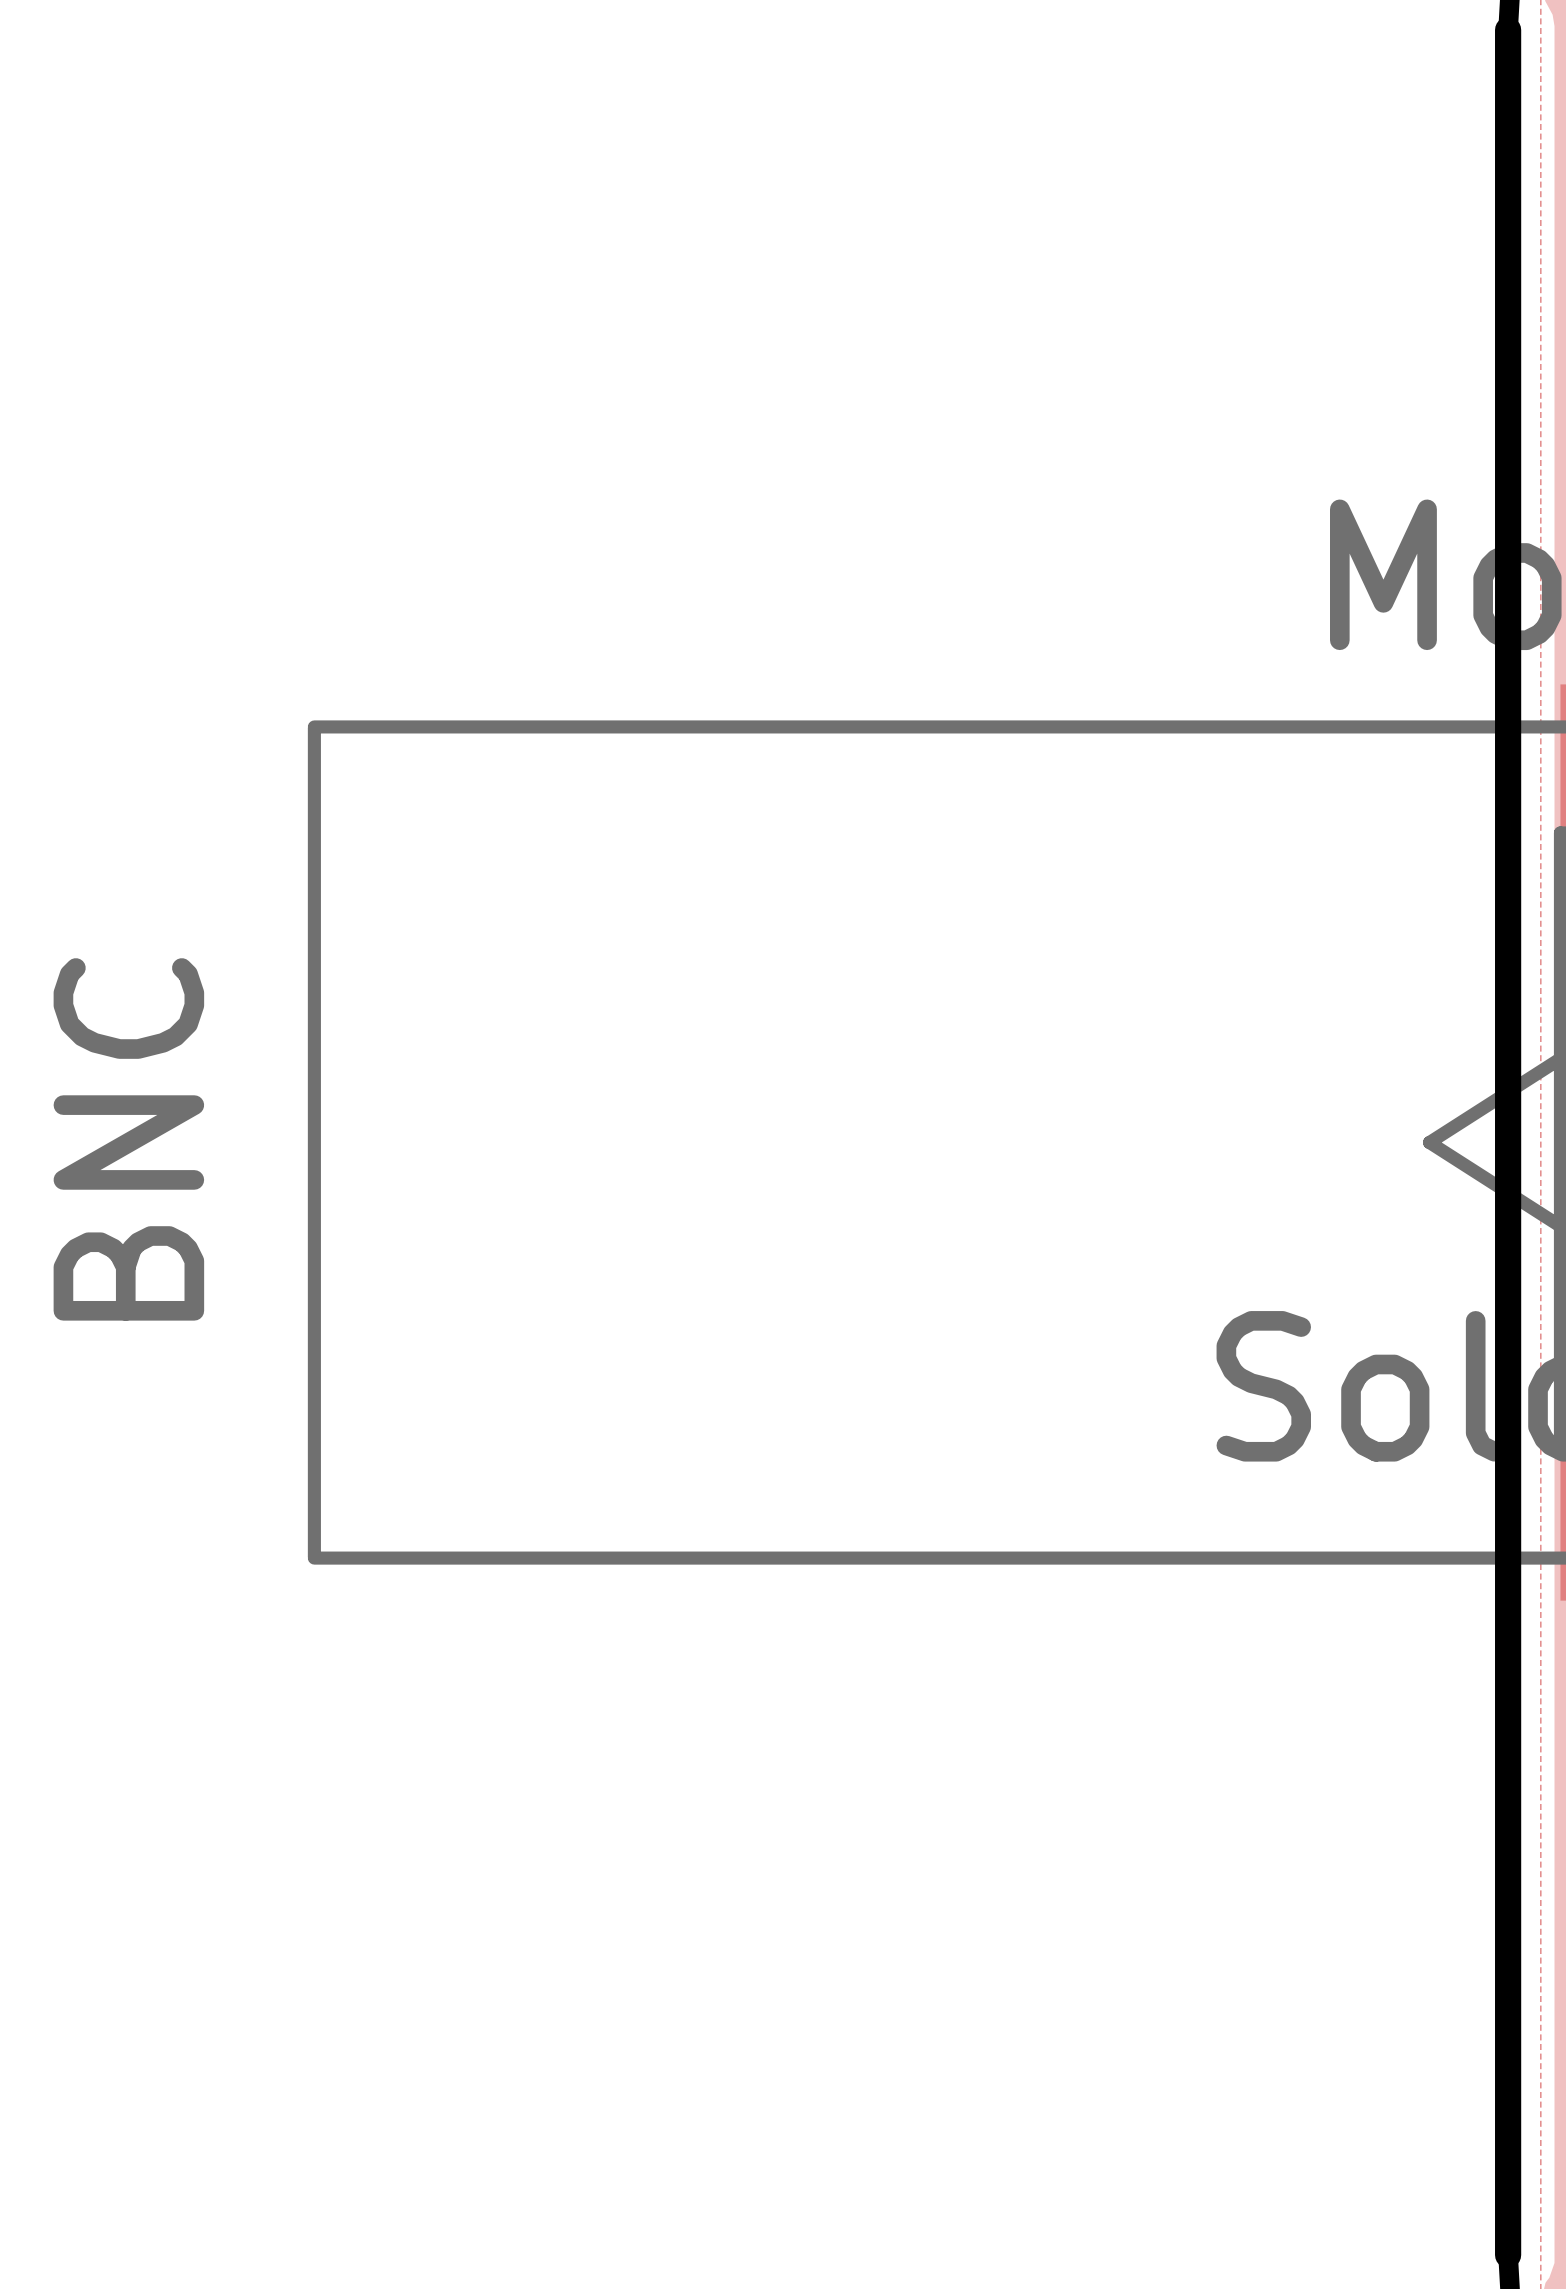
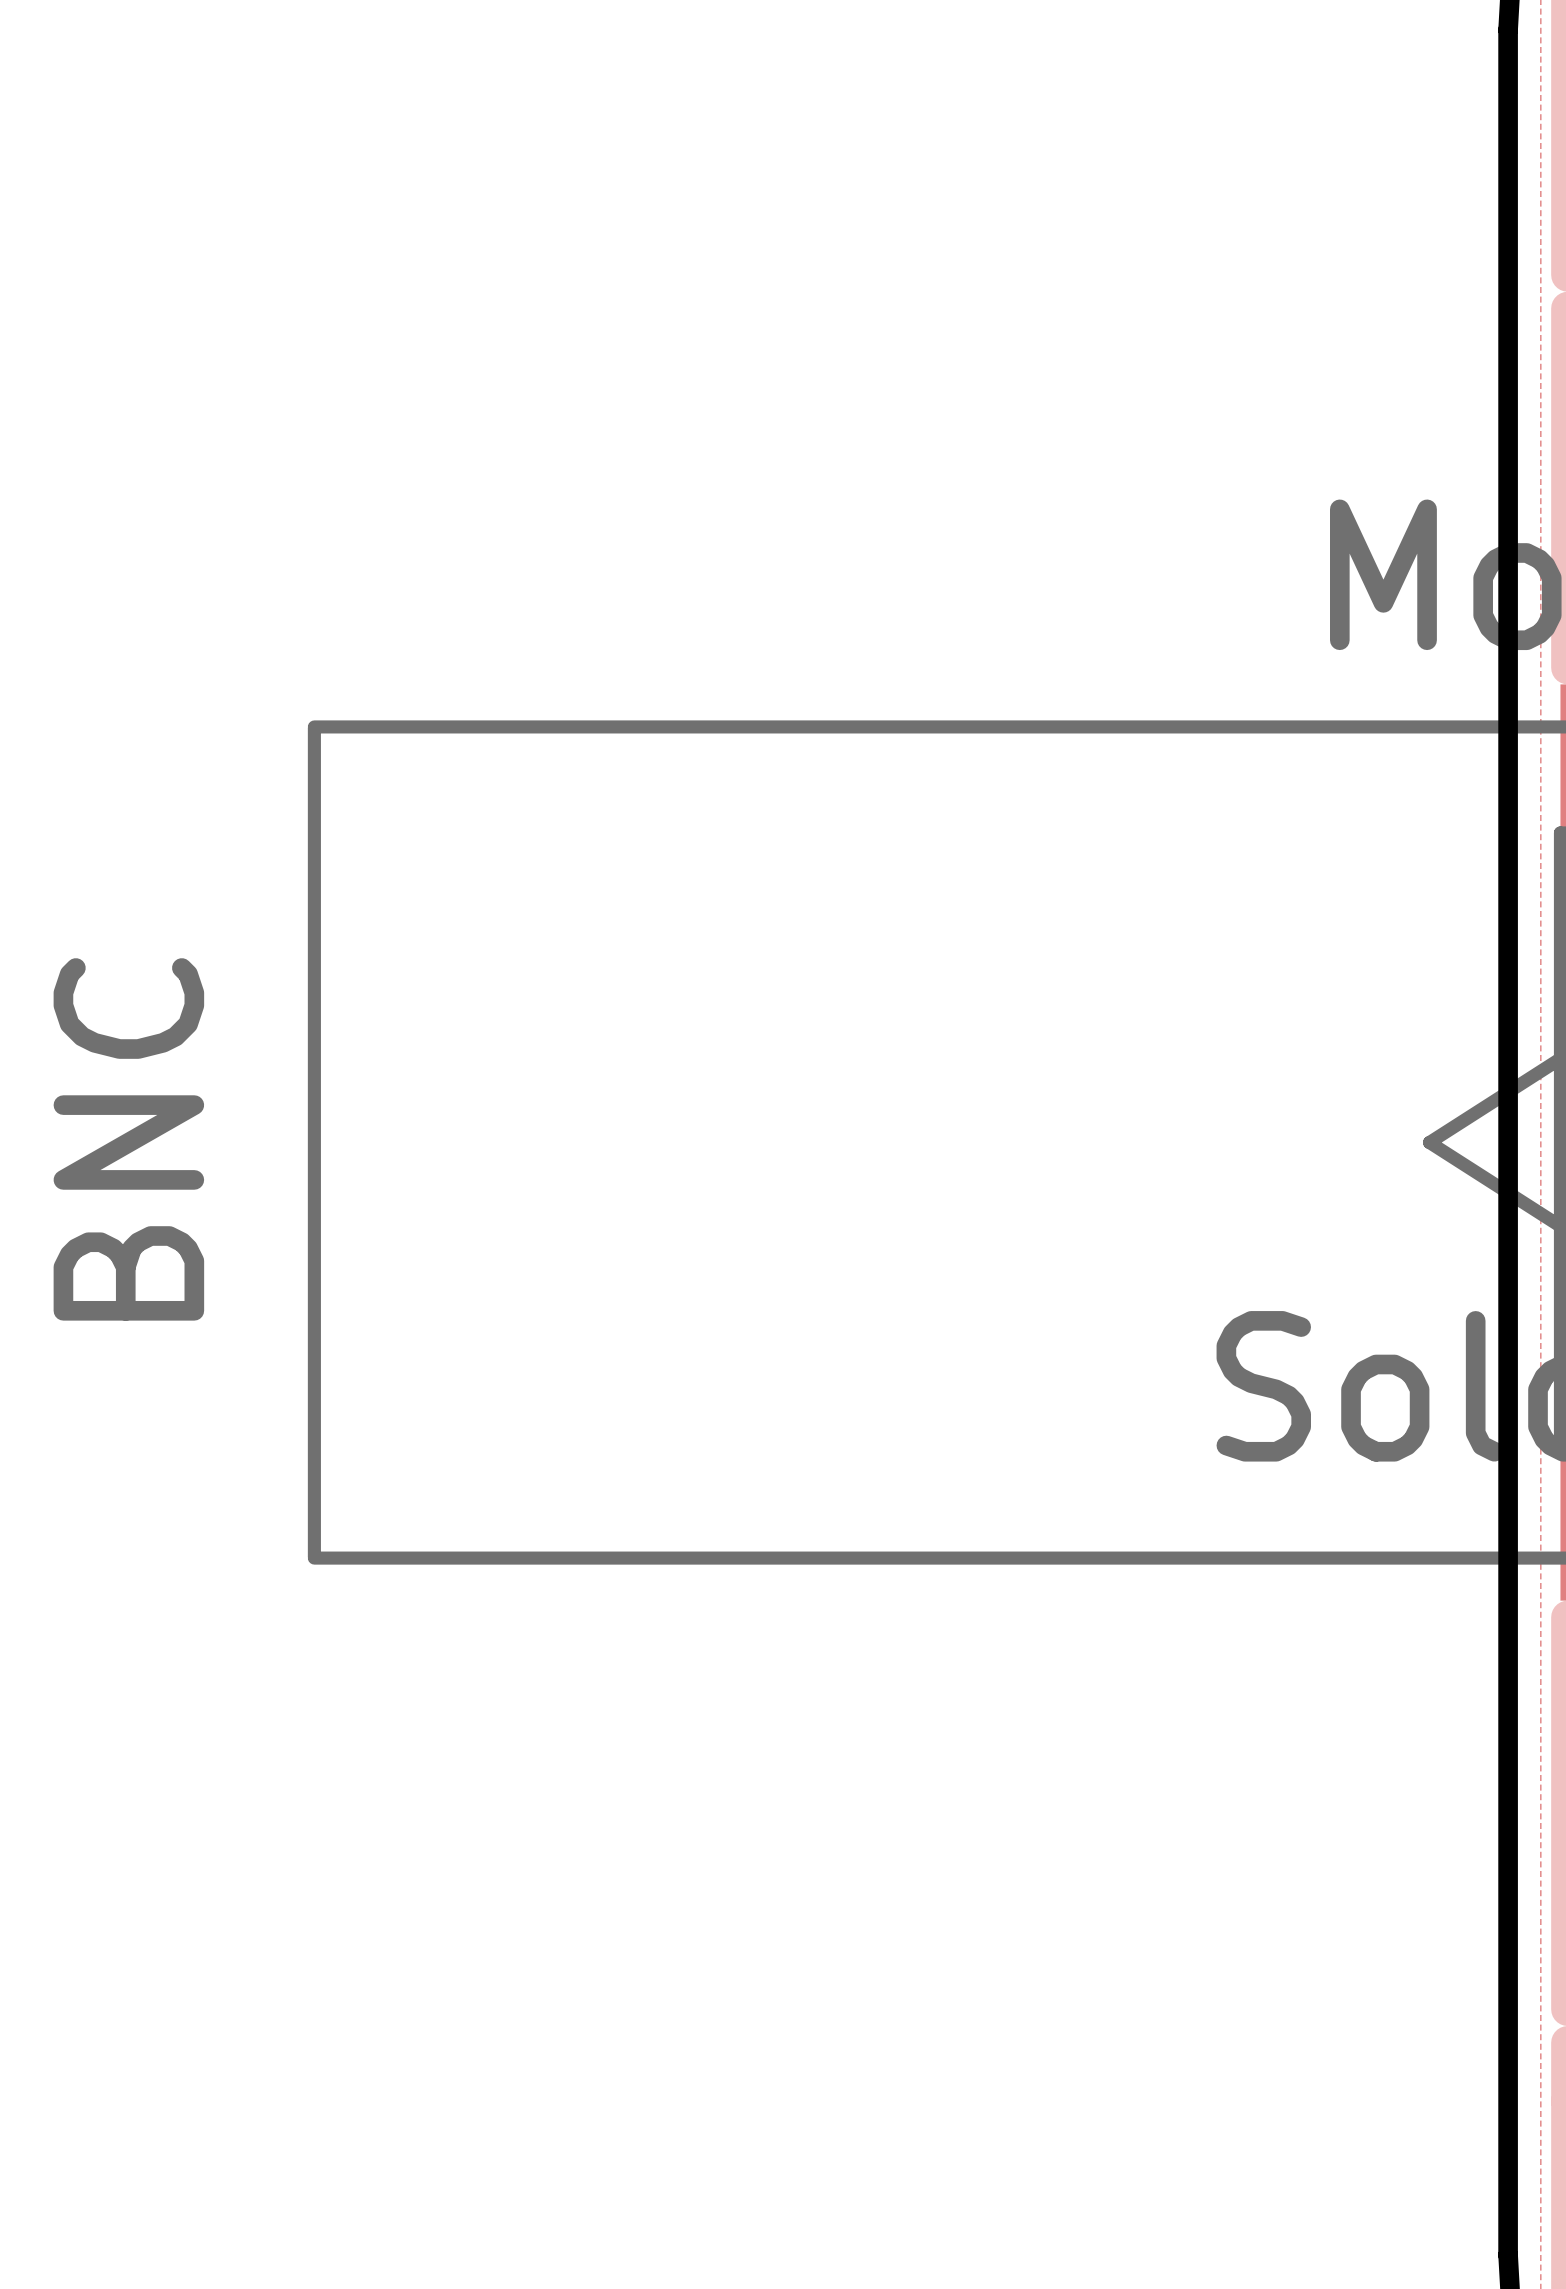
board edge width: thick (1508, 29) (1508, 2255) -> thin (1508, 29) (1508, 2255)

